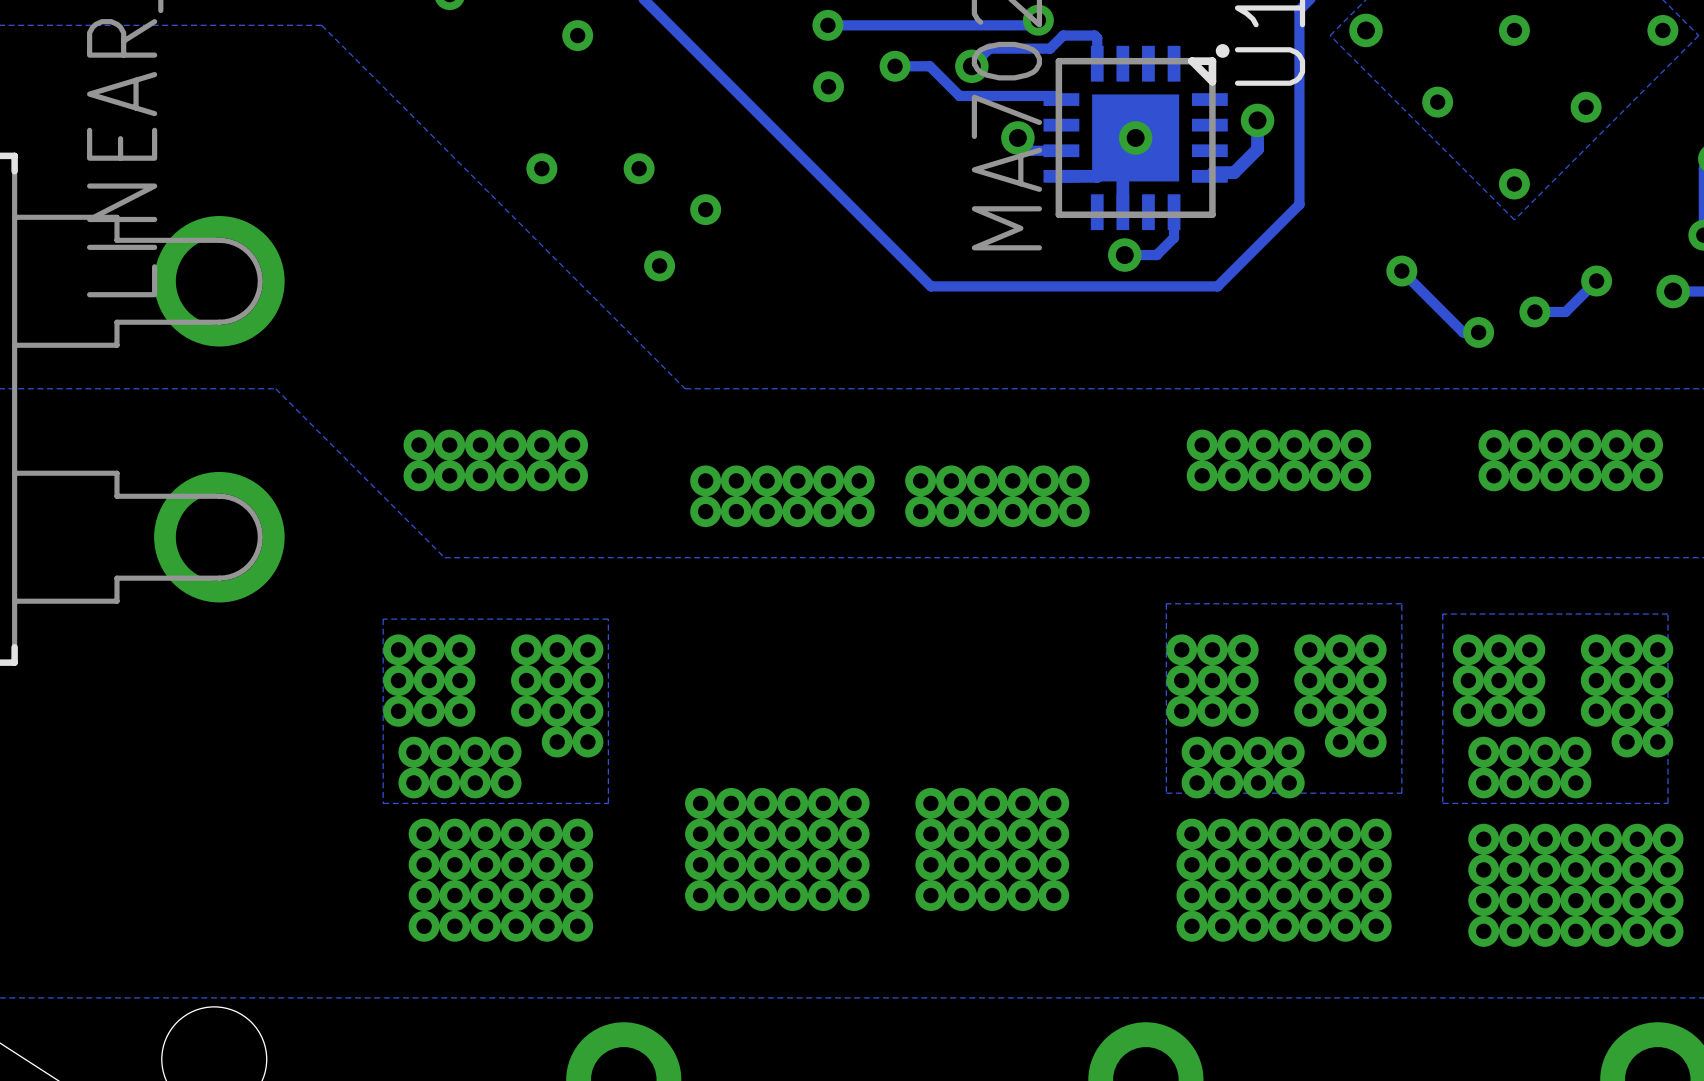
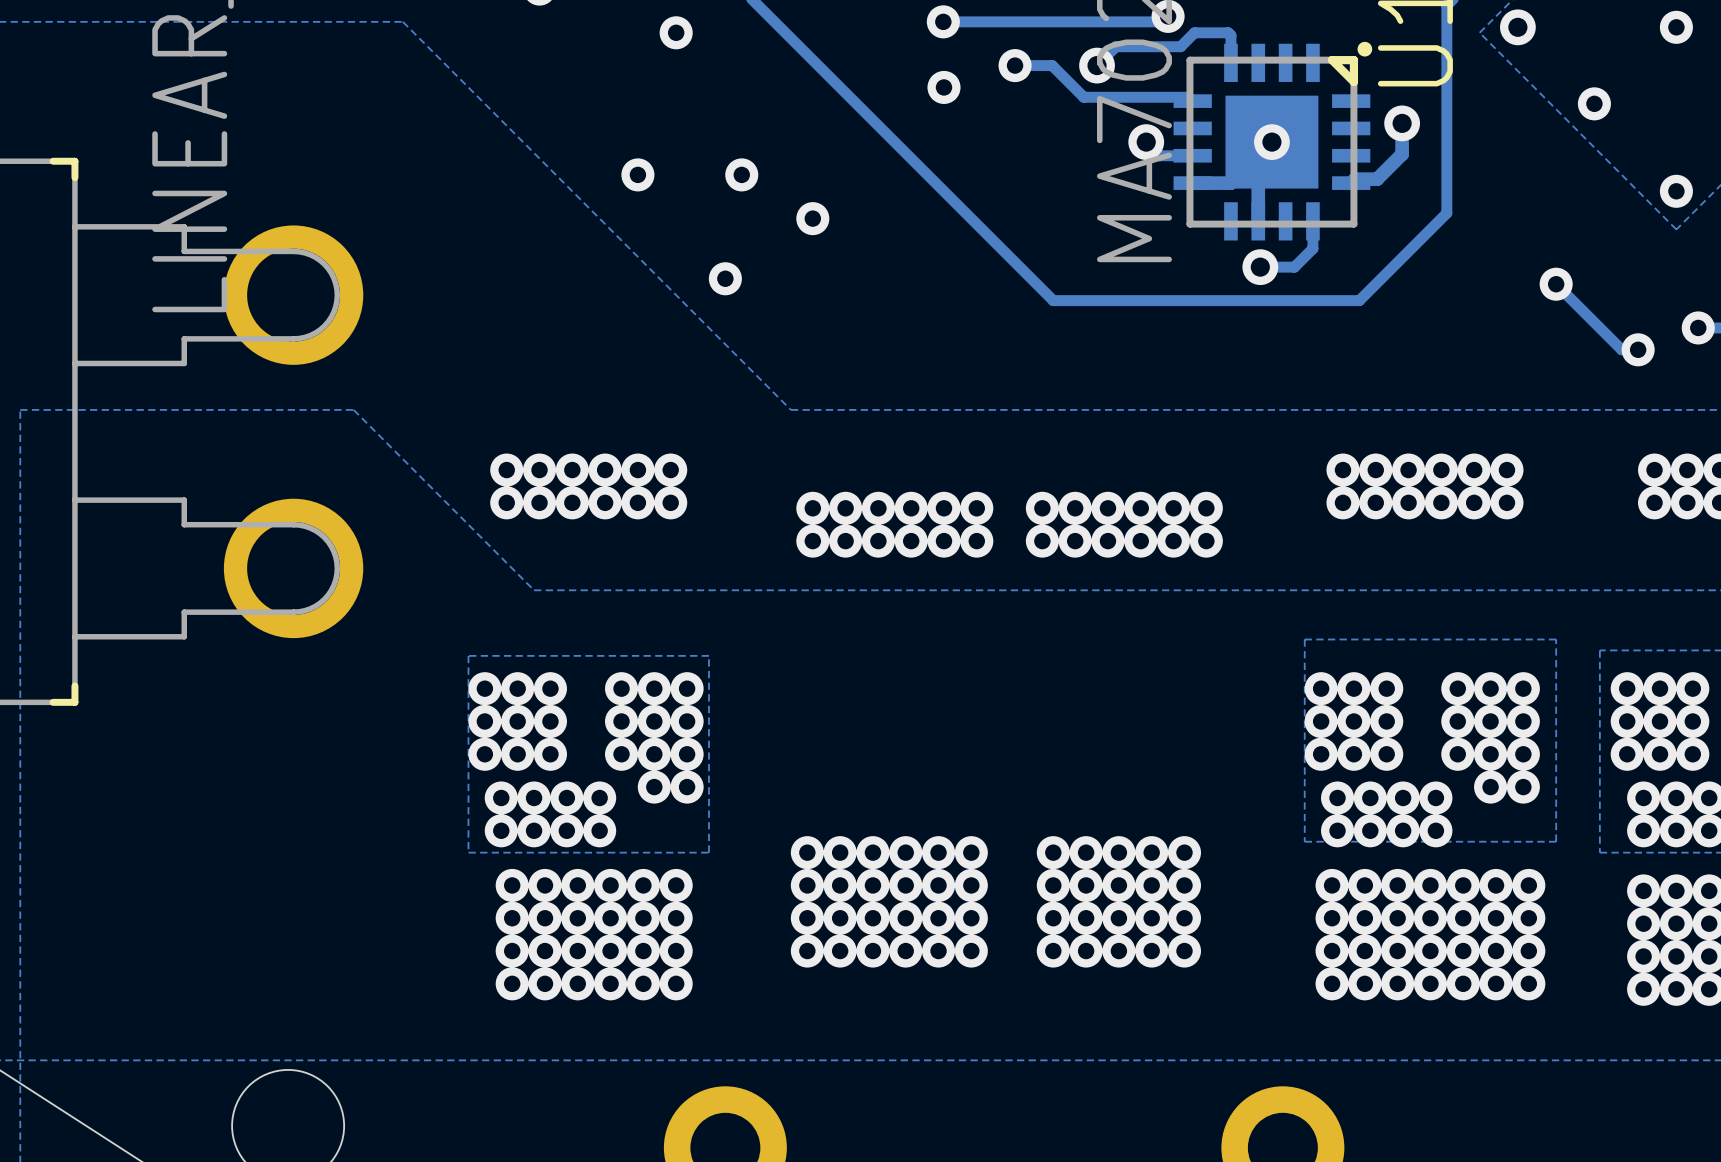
via position: (659, 265) -> (725, 278)

